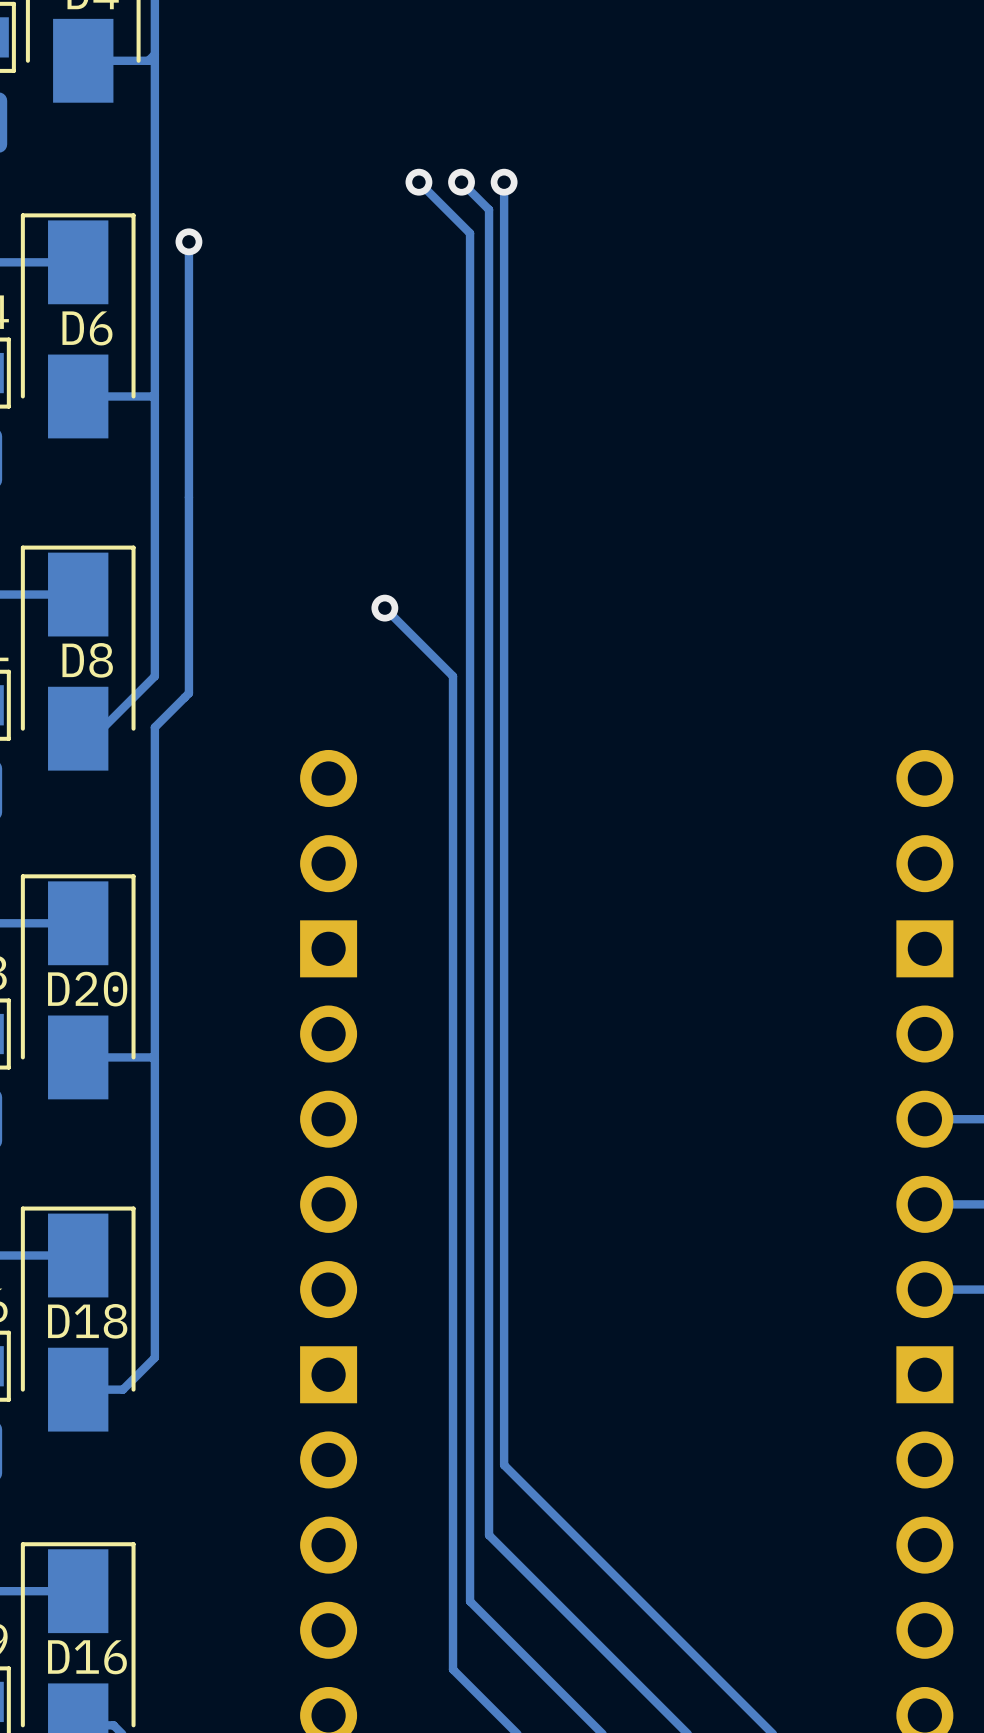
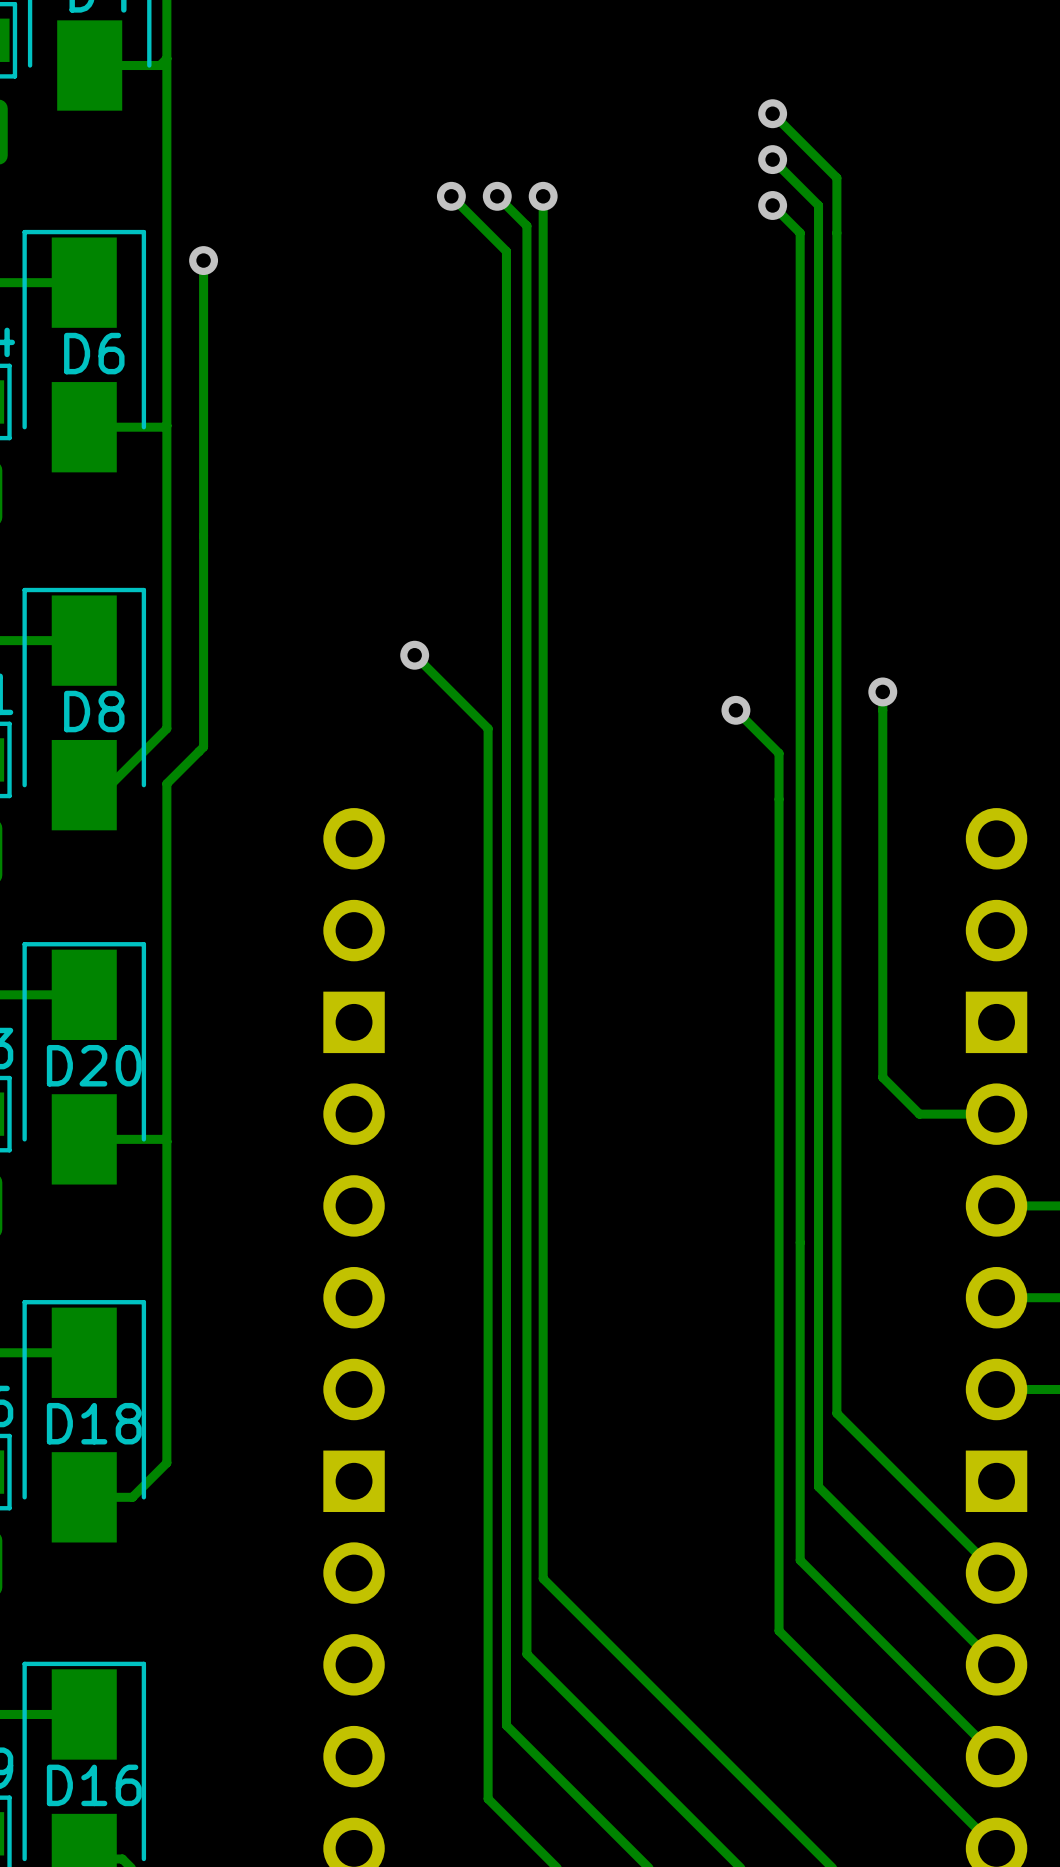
track: none -> (772, 113) (836, 177) (836, 1413) (996, 1573)
via: none -> (772, 113)
track: none -> (772, 159) (818, 205) (818, 1486) (996, 1664)
via: none -> (772, 159)
track: none -> (772, 205) (800, 233) (800, 1560) (996, 1756)
via: none -> (772, 205)
track: none -> (882, 691) (882, 1077) (919, 1114) (996, 1114)
via: none -> (882, 691)
track: none -> (735, 710) (779, 753) (779, 1630) (996, 1848)
via: none -> (735, 710)

